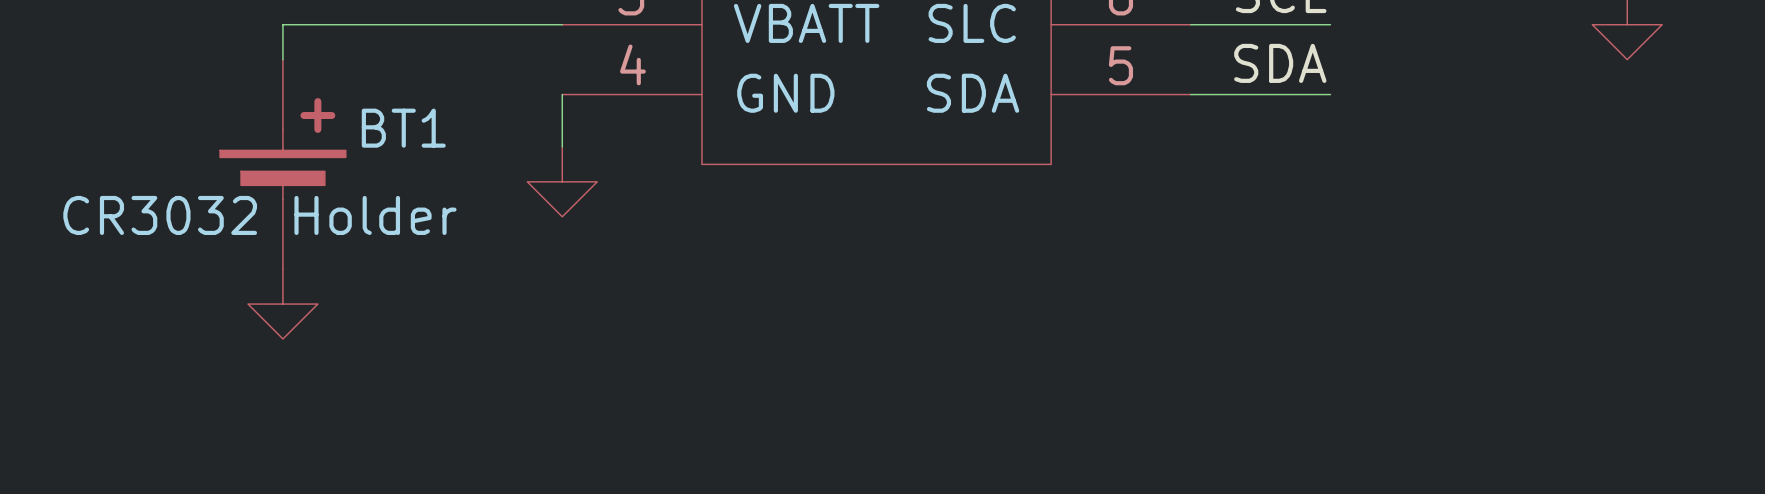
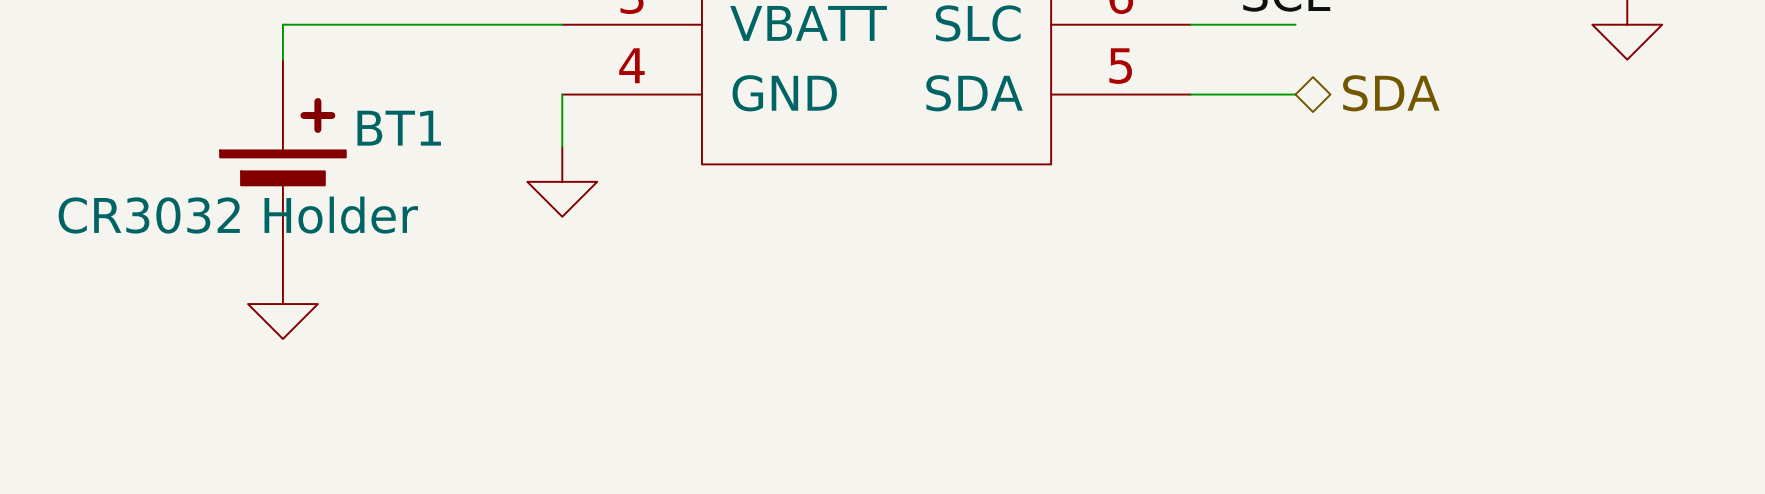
wire: (1295, 24) (1330, 24) -> none
label: SDA (1280, 63) -> none
hierarchical label: none -> SDA (1391, 93)
wire: (1295, 94) (1330, 94) -> none

